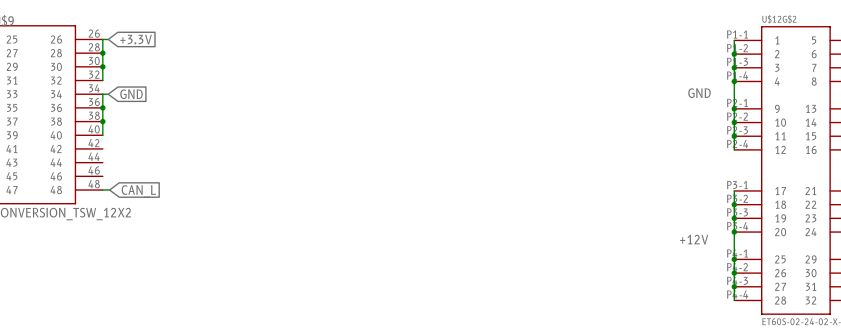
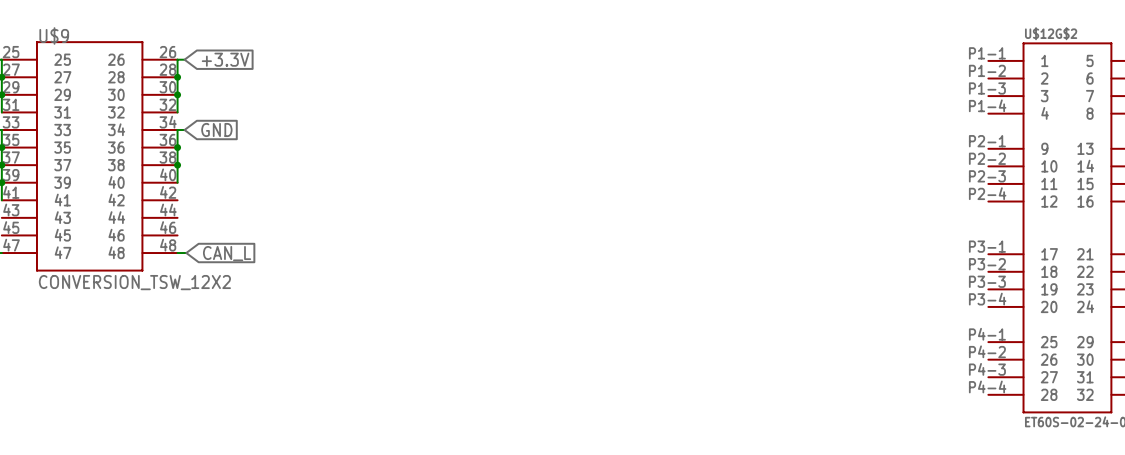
wire: (734, 40) (734, 149) -> none
junction: (734, 54) -> none
junction: (734, 67) -> none
junction: (734, 81) -> none
label: GND (699, 93) -> none
junction: (734, 108) -> none
junction: (734, 122) -> none
junction: (734, 136) -> none
wire: (734, 190) (734, 300) -> none
junction: (734, 204) -> none
junction: (734, 218) -> none
junction: (734, 232) -> none
label: +12V (694, 239) -> none
junction: (734, 259) -> none
junction: (734, 273) -> none
junction: (734, 286) -> none

